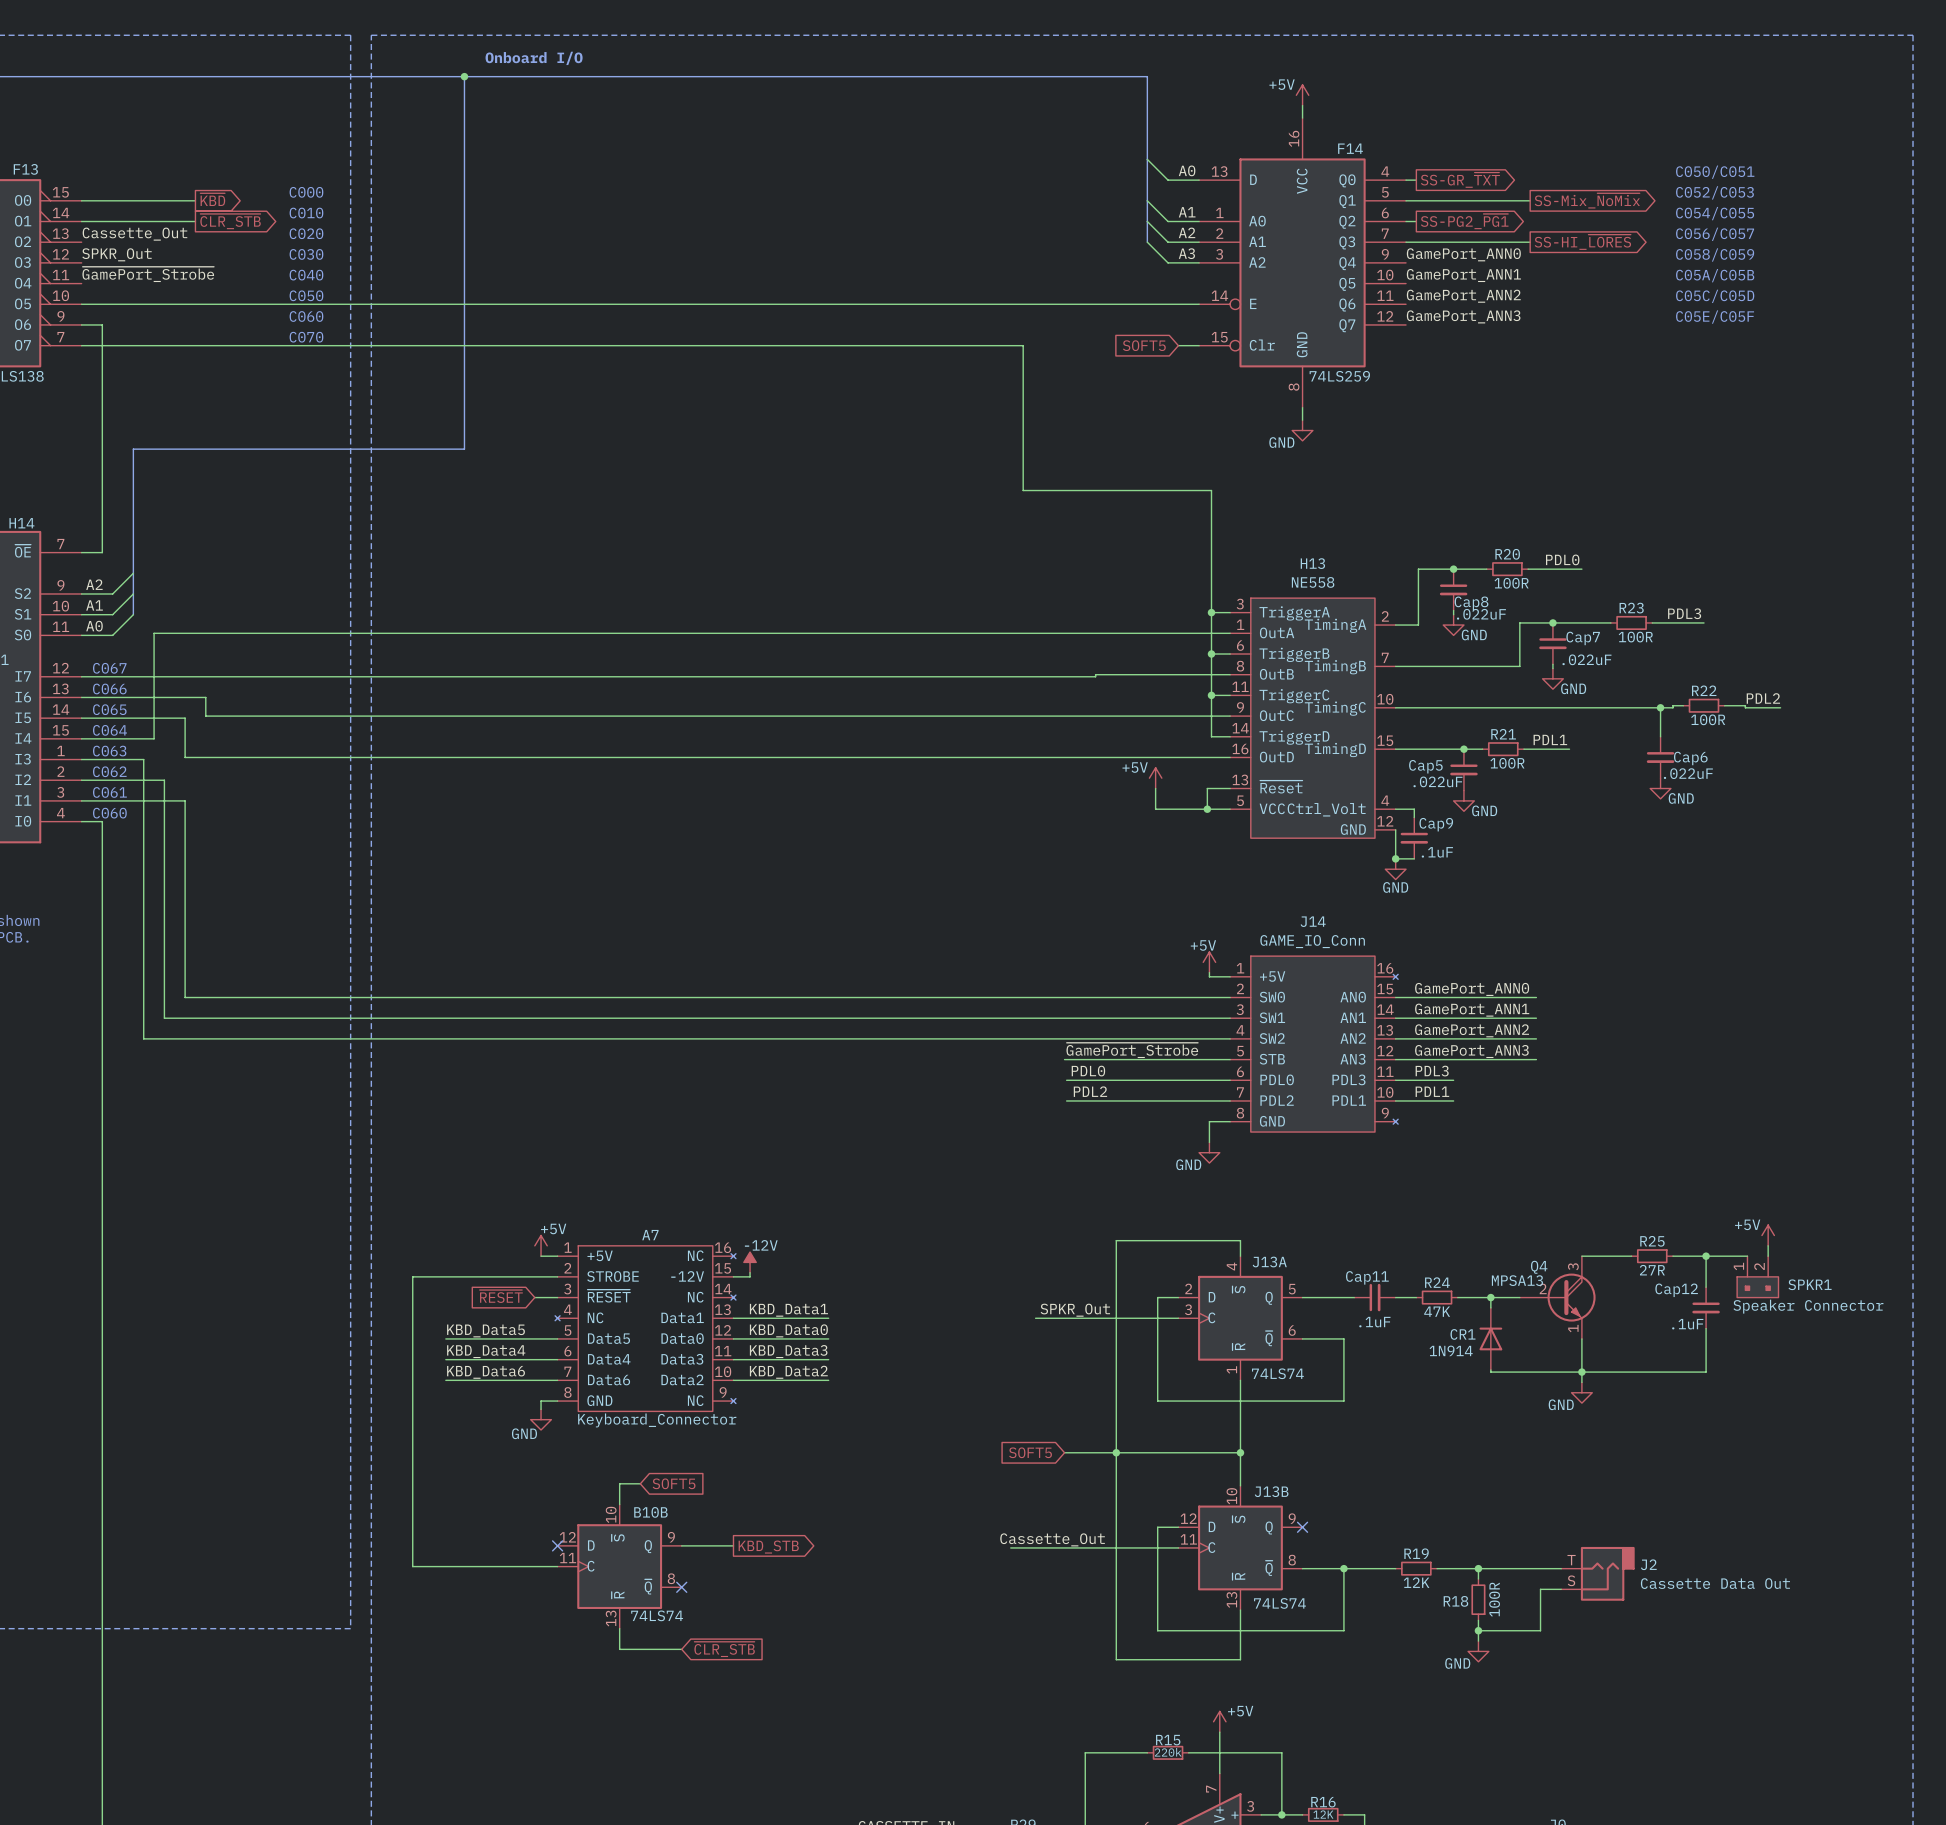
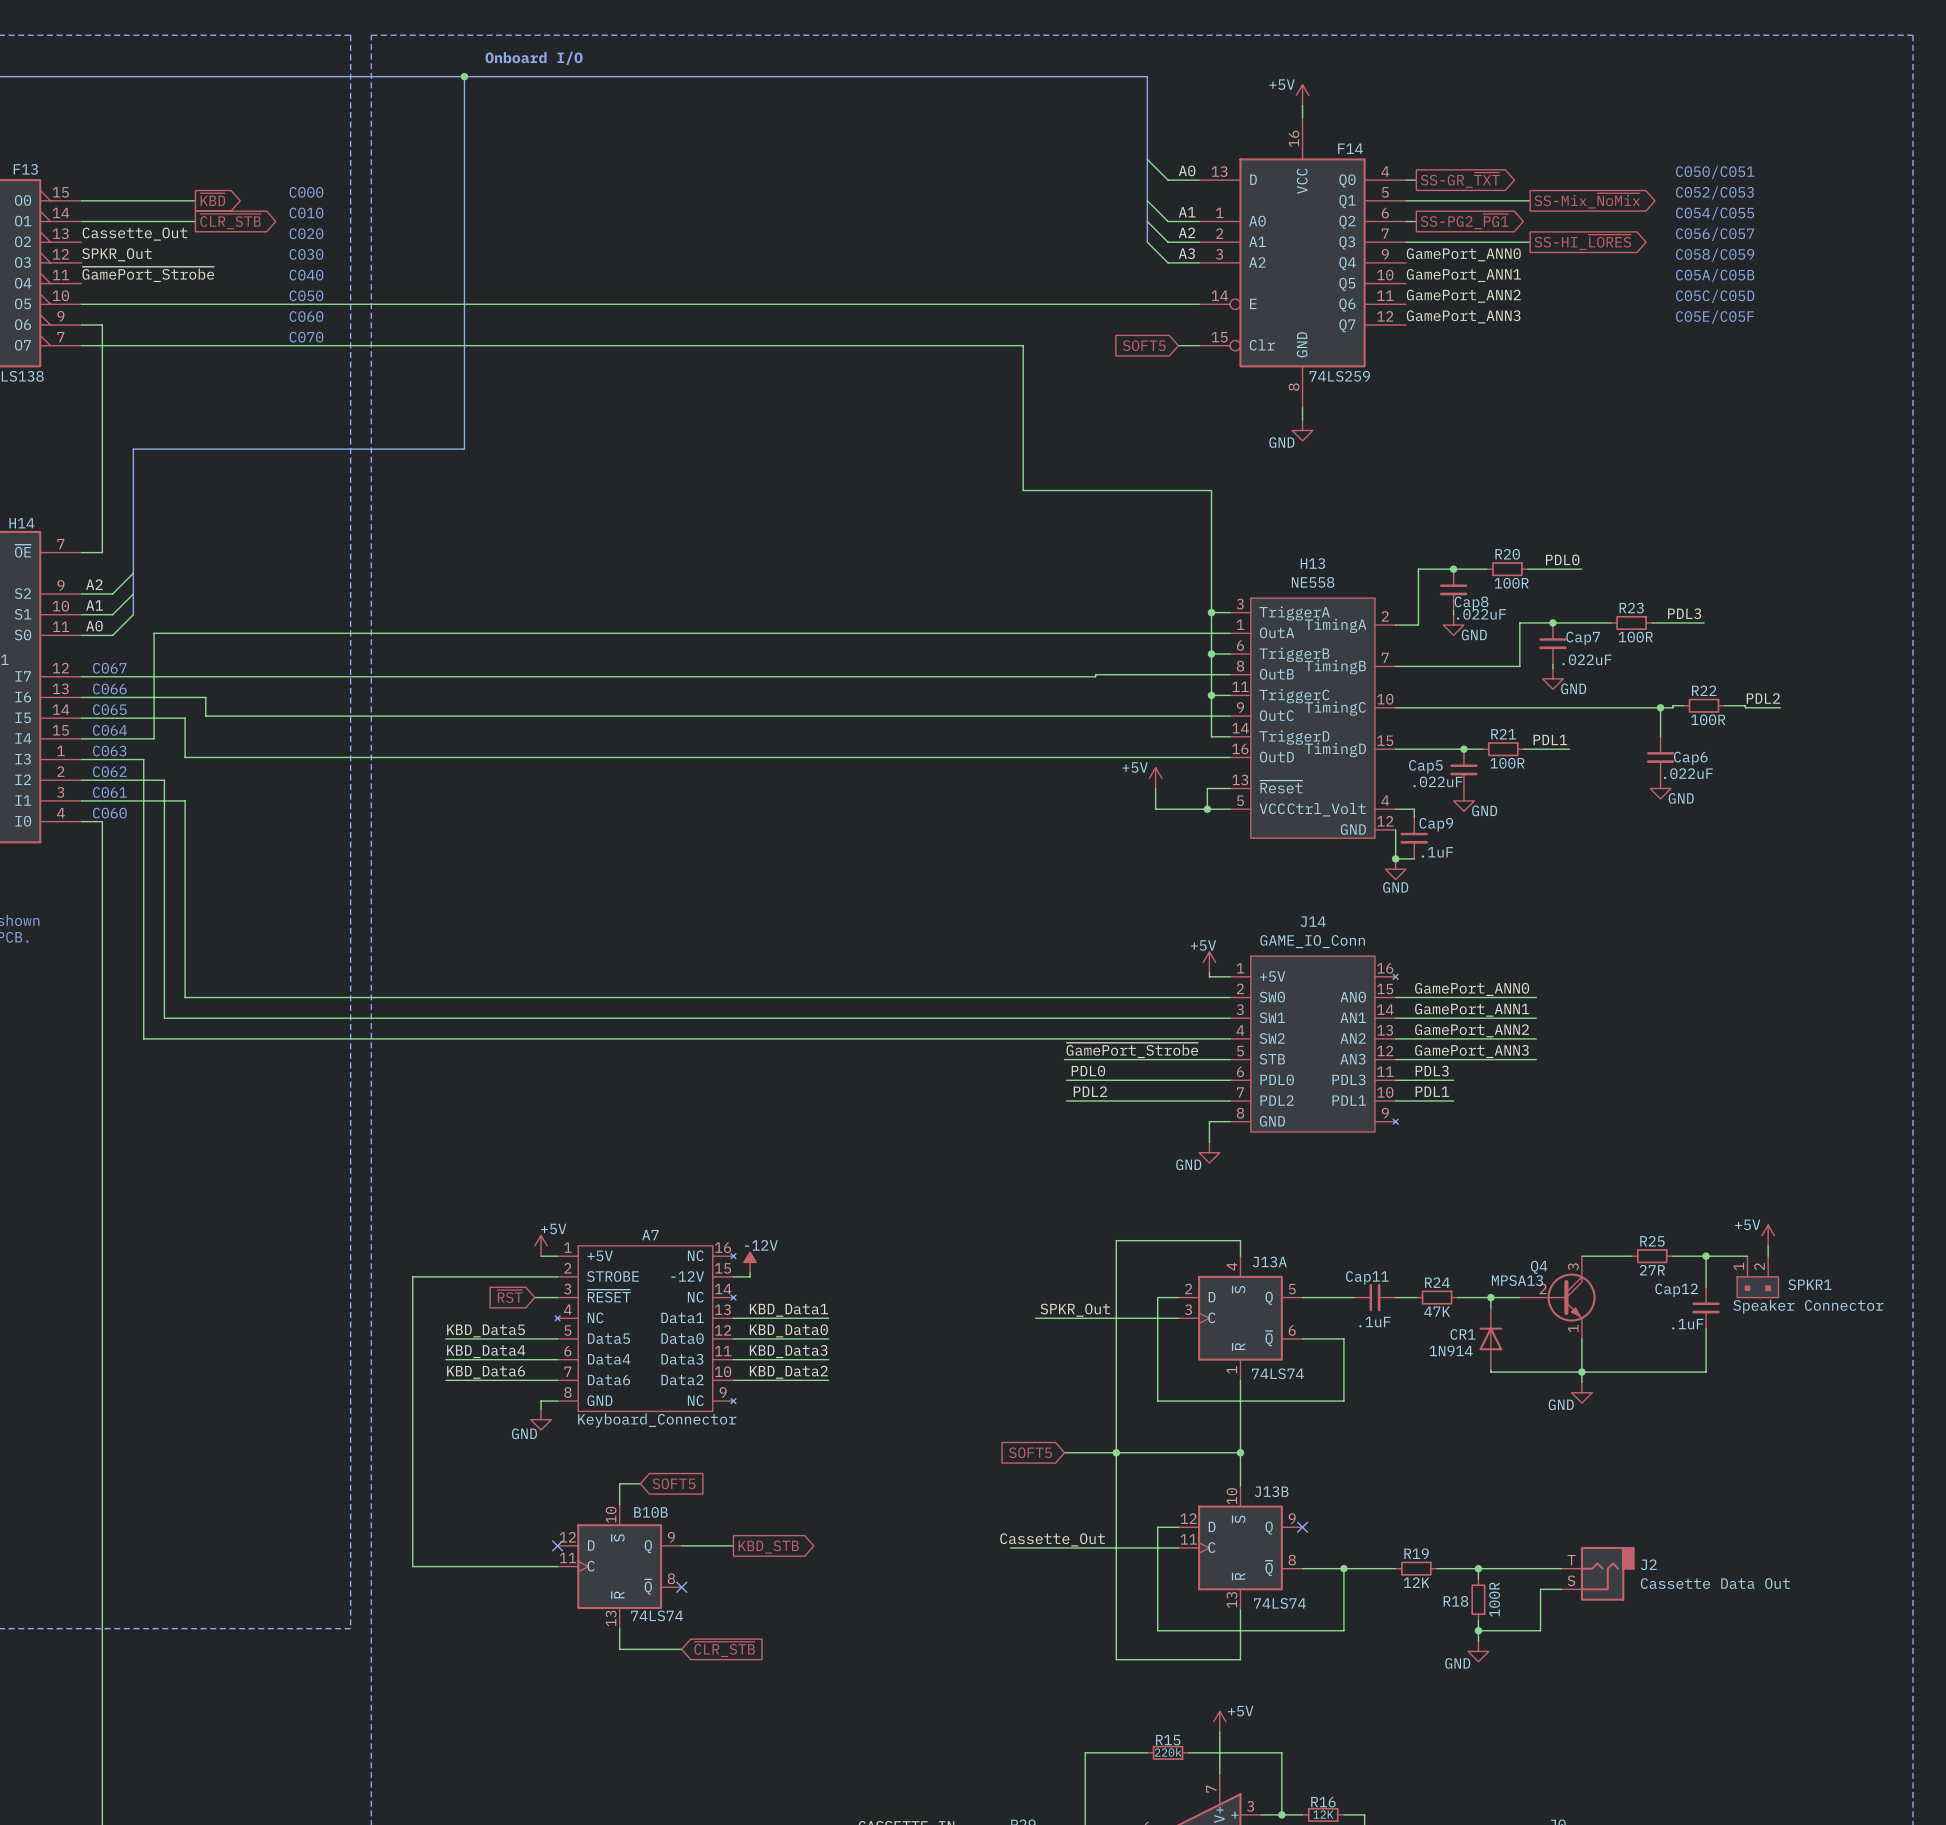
global label: ~{RESET} (501, 1296) -> ~{RST} (510, 1296)

